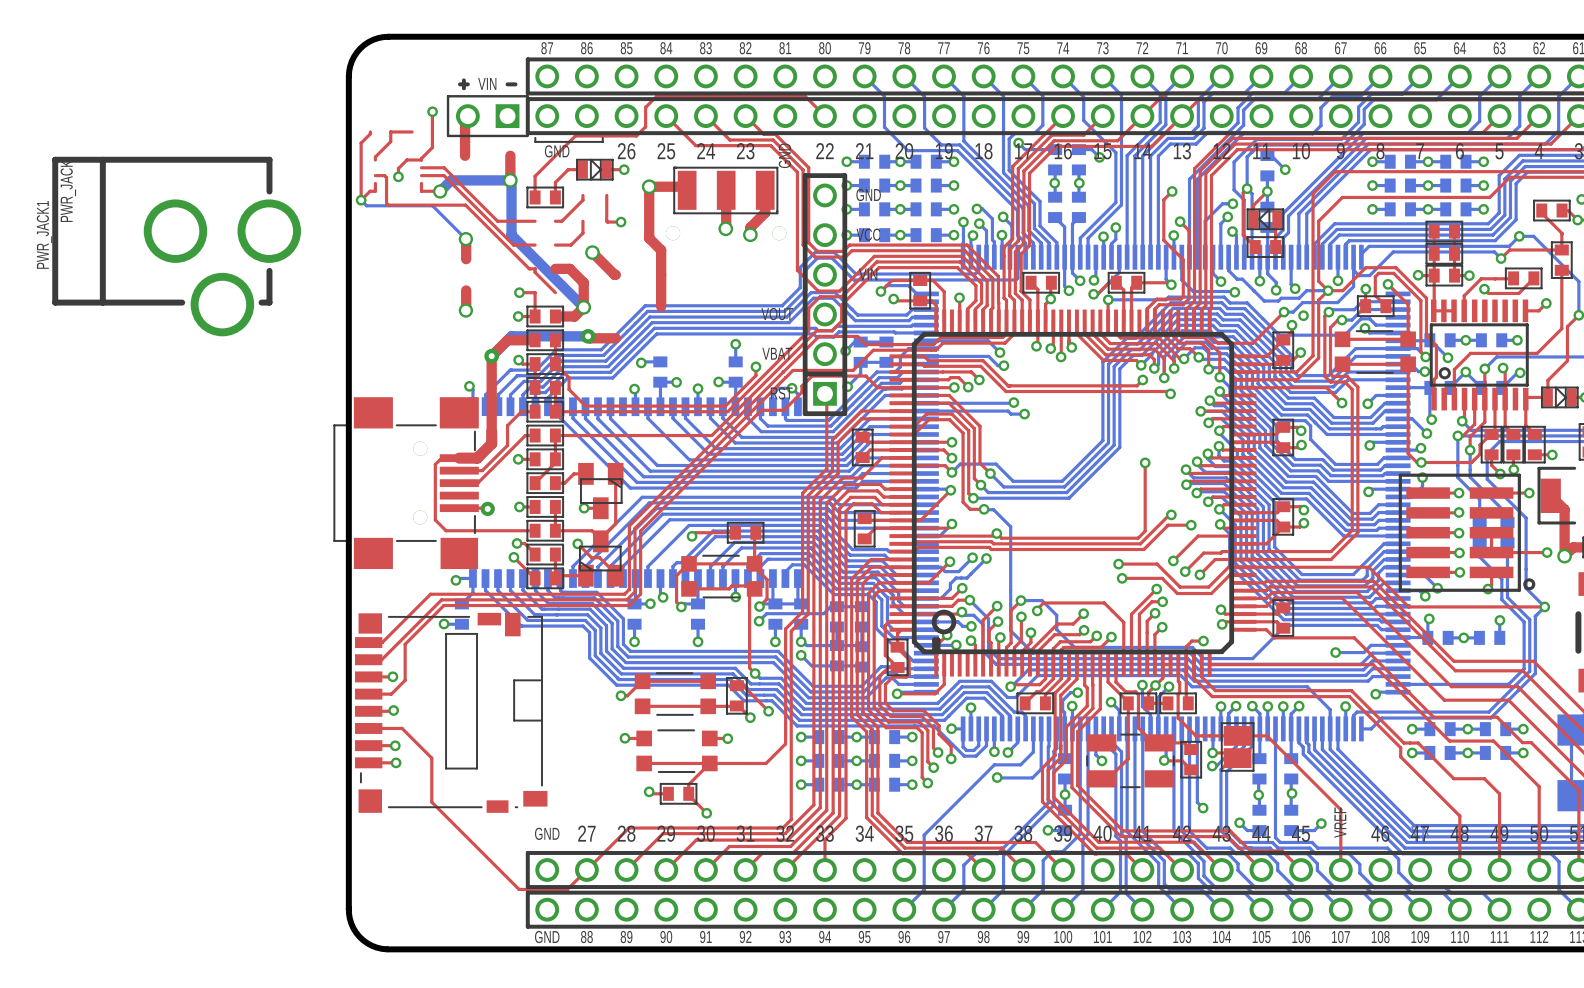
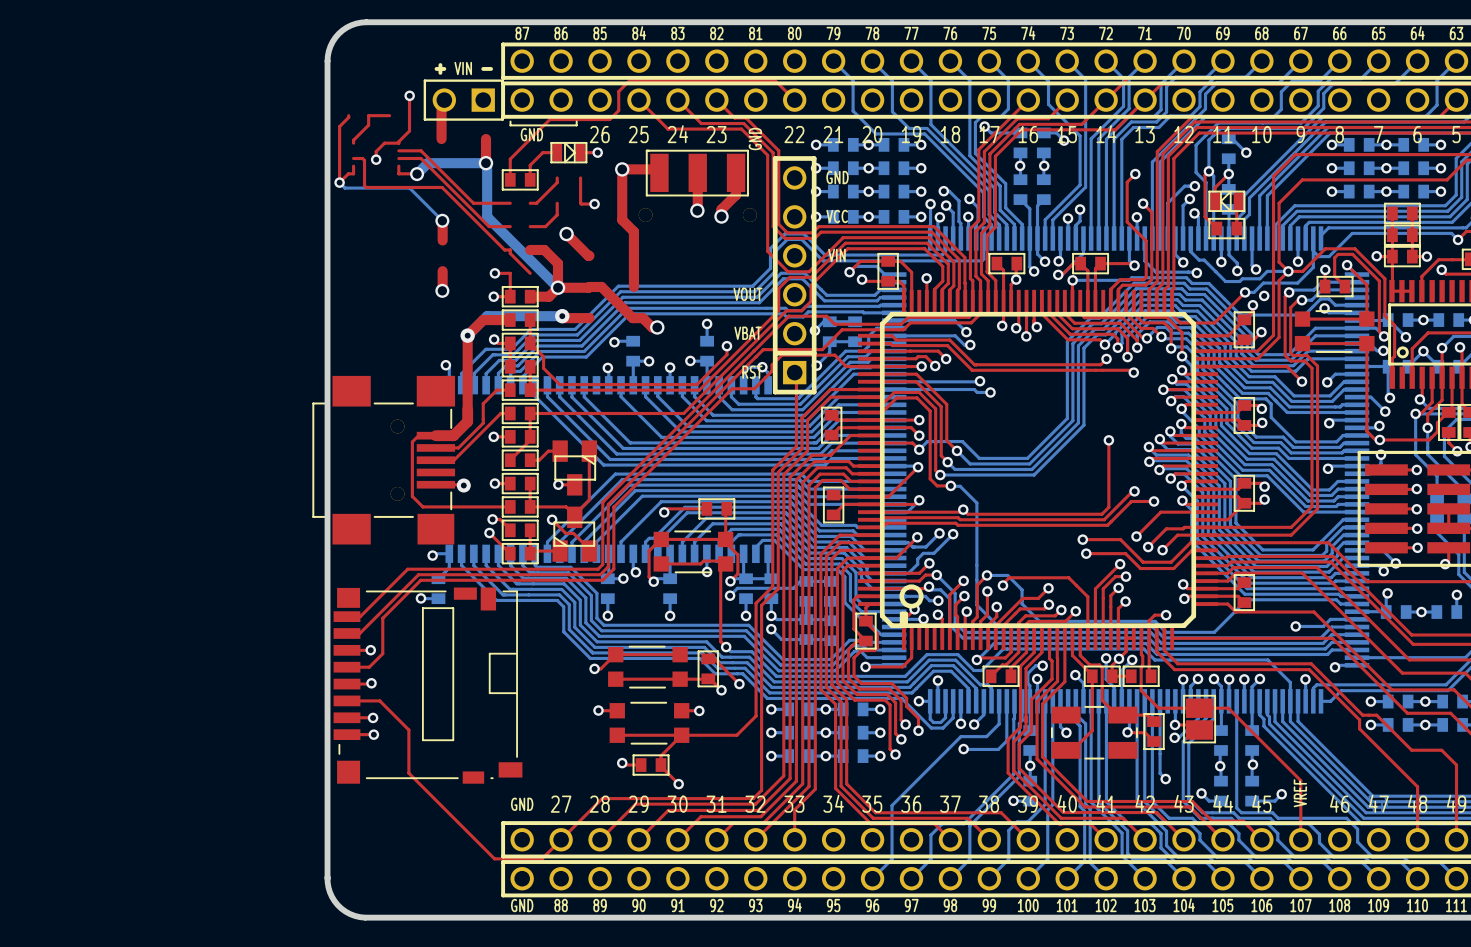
PWR_JACK1: PWR_JACK (176, 246) -> none
top track: none -> (558, 287) (601, 286) (632, 318) (642, 318) (652, 327) (657, 327)
via: none -> (657, 327)

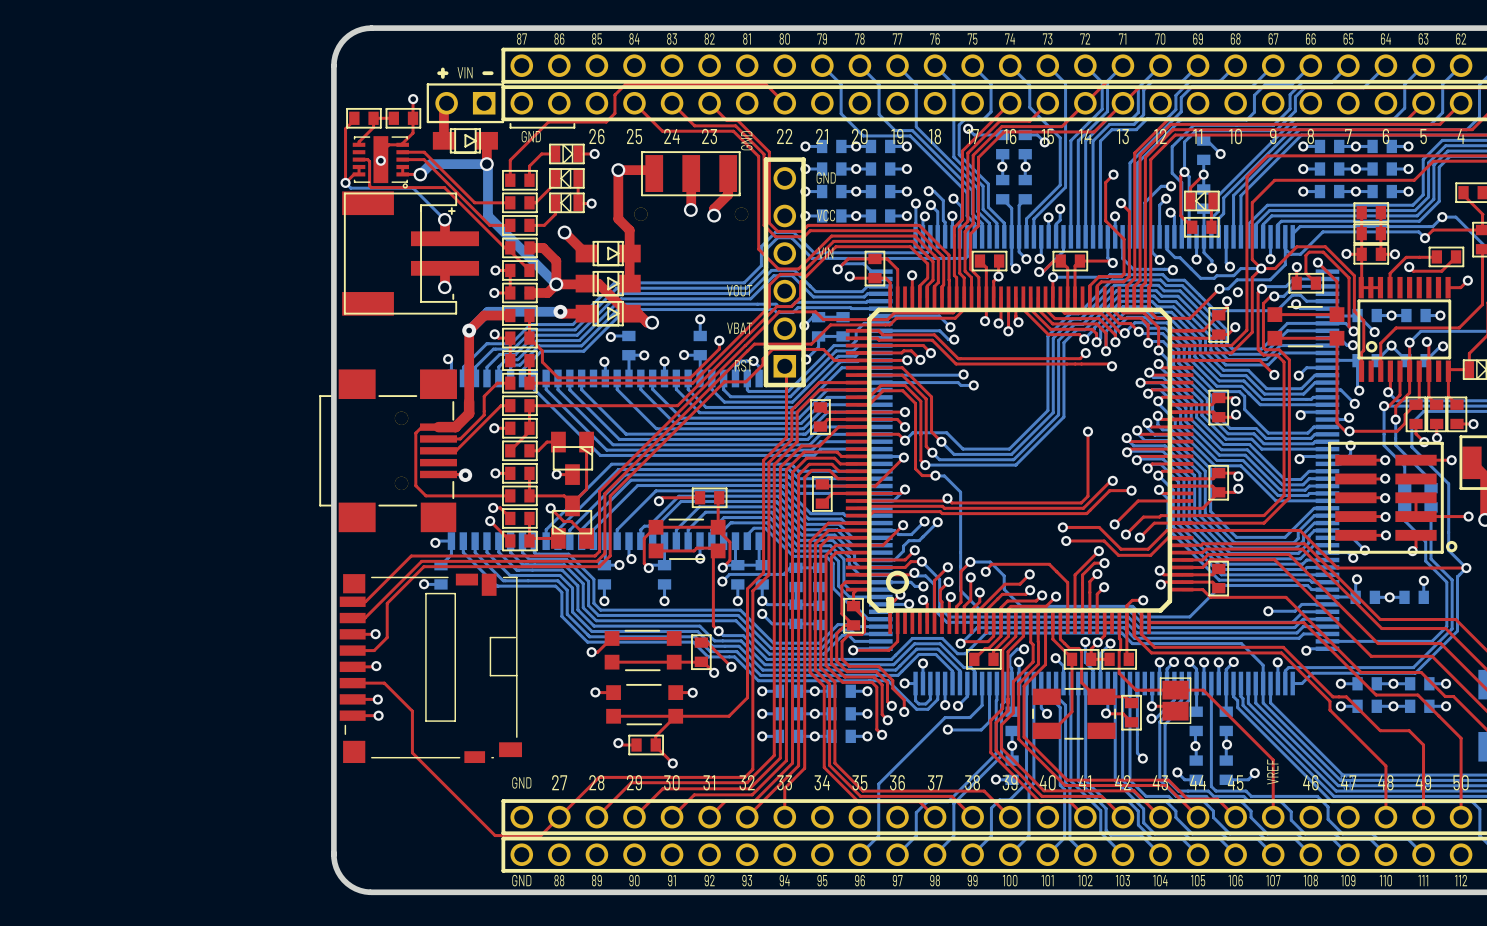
part: none -> (363, 118)
part: none -> (403, 118)
part: none -> (465, 140)
part: none -> (380, 162)
part: none -> (566, 178)
part: none -> (519, 202)
part: none -> (566, 202)
part: none -> (519, 225)
part: none -> (519, 247)
part: none -> (410, 253)
part: none -> (608, 253)
part: none -> (519, 270)
part: none -> (608, 283)
part: none -> (608, 313)

